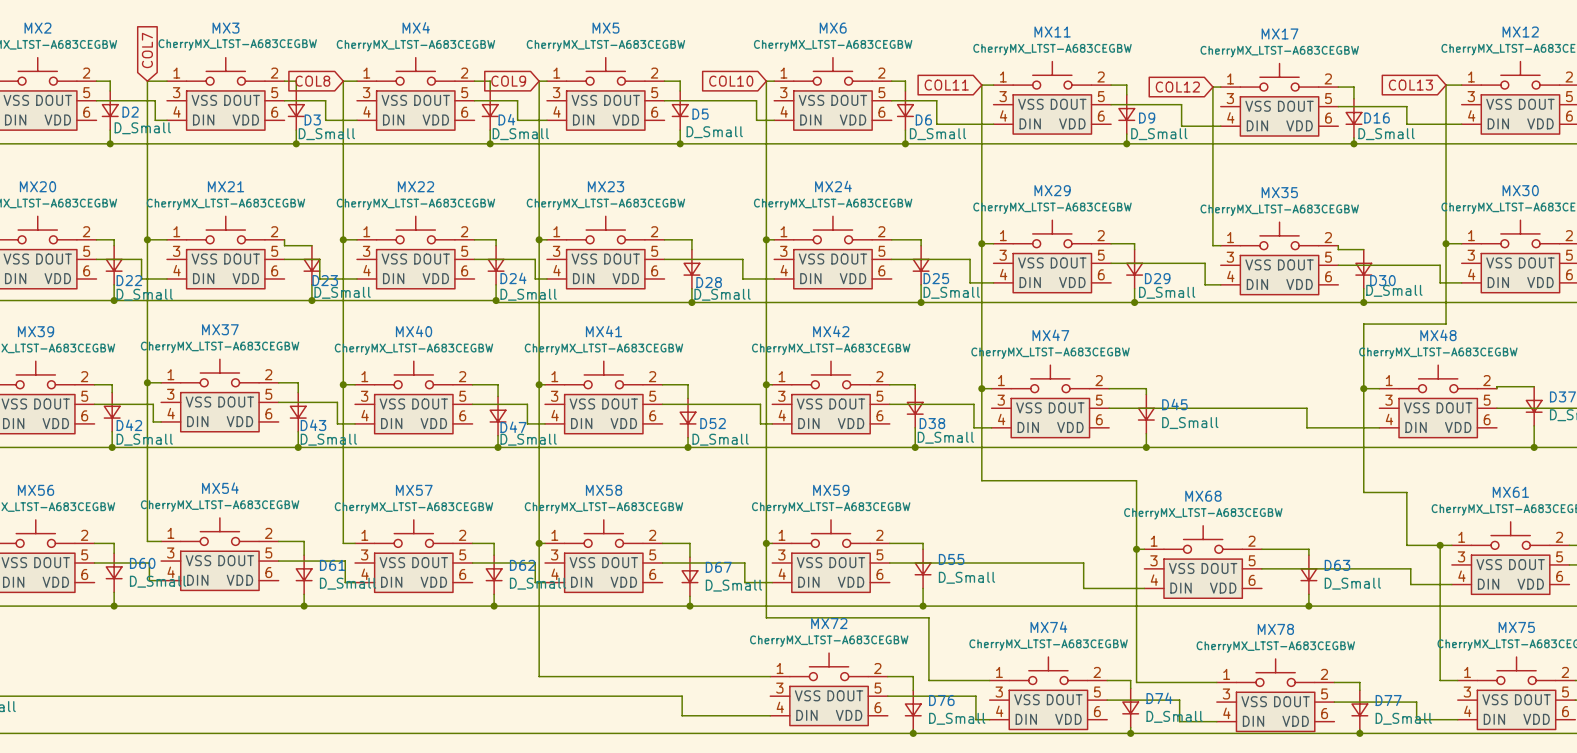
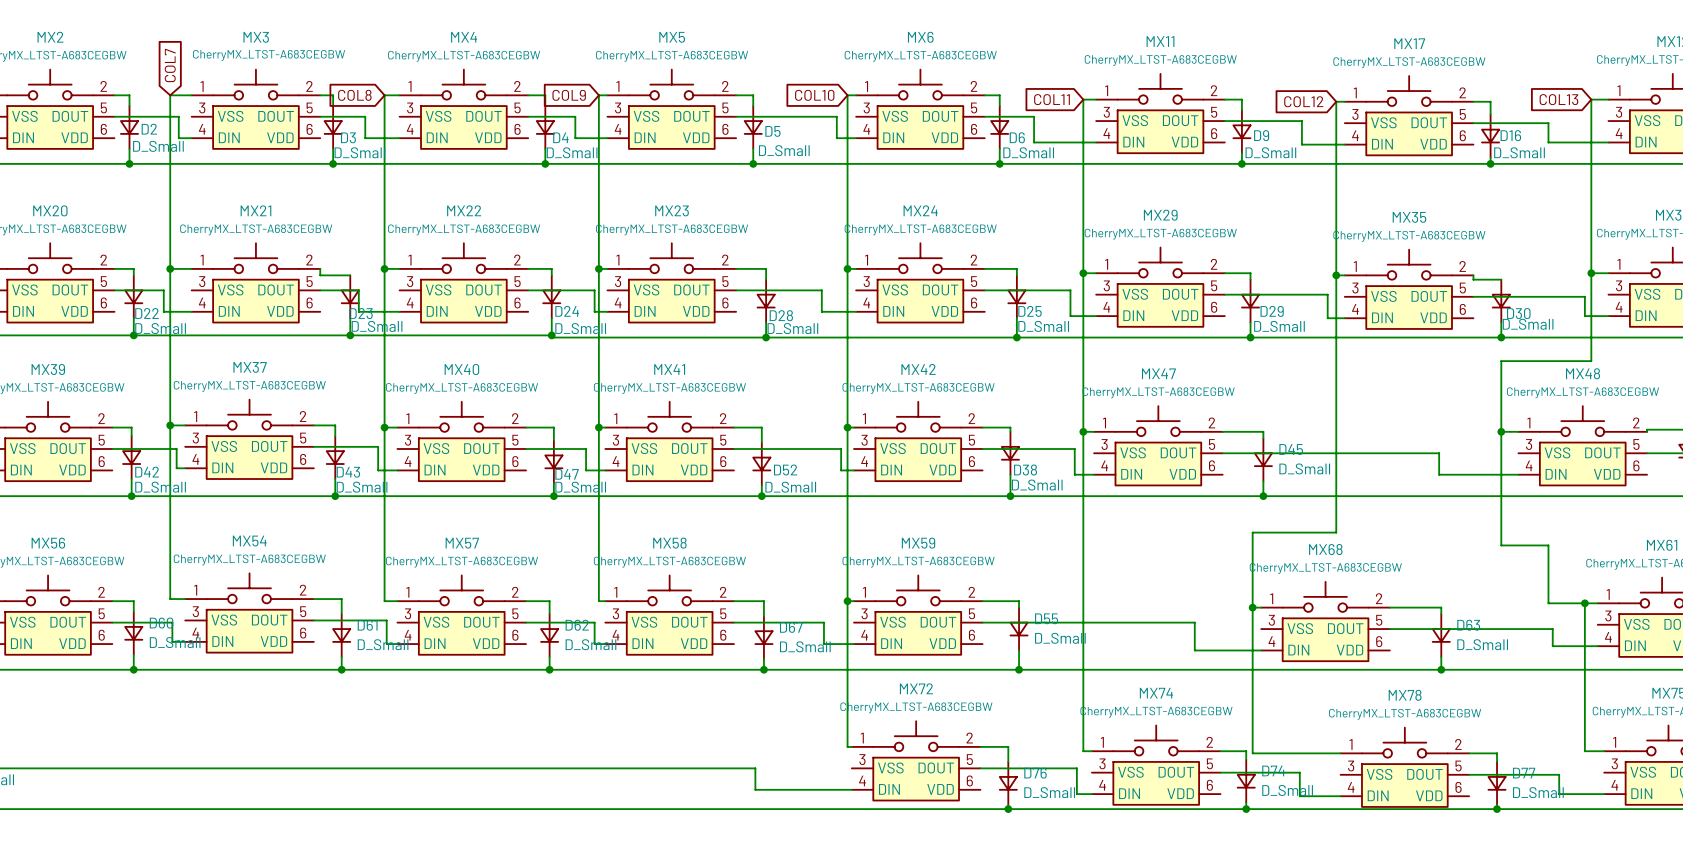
wire: none -> (1336, 275) (1336, 532) (1252, 532)
junction: none -> (1336, 275)
wire: (981, 480) (1136, 480) -> (1083, 532) (1083, 751)
wire: (539, 543) (539, 676) (766, 676) -> none
junction: (539, 543) -> none
wire: (766, 617) (928, 617) (928, 680) (981, 680) -> (847, 682) (847, 746)

